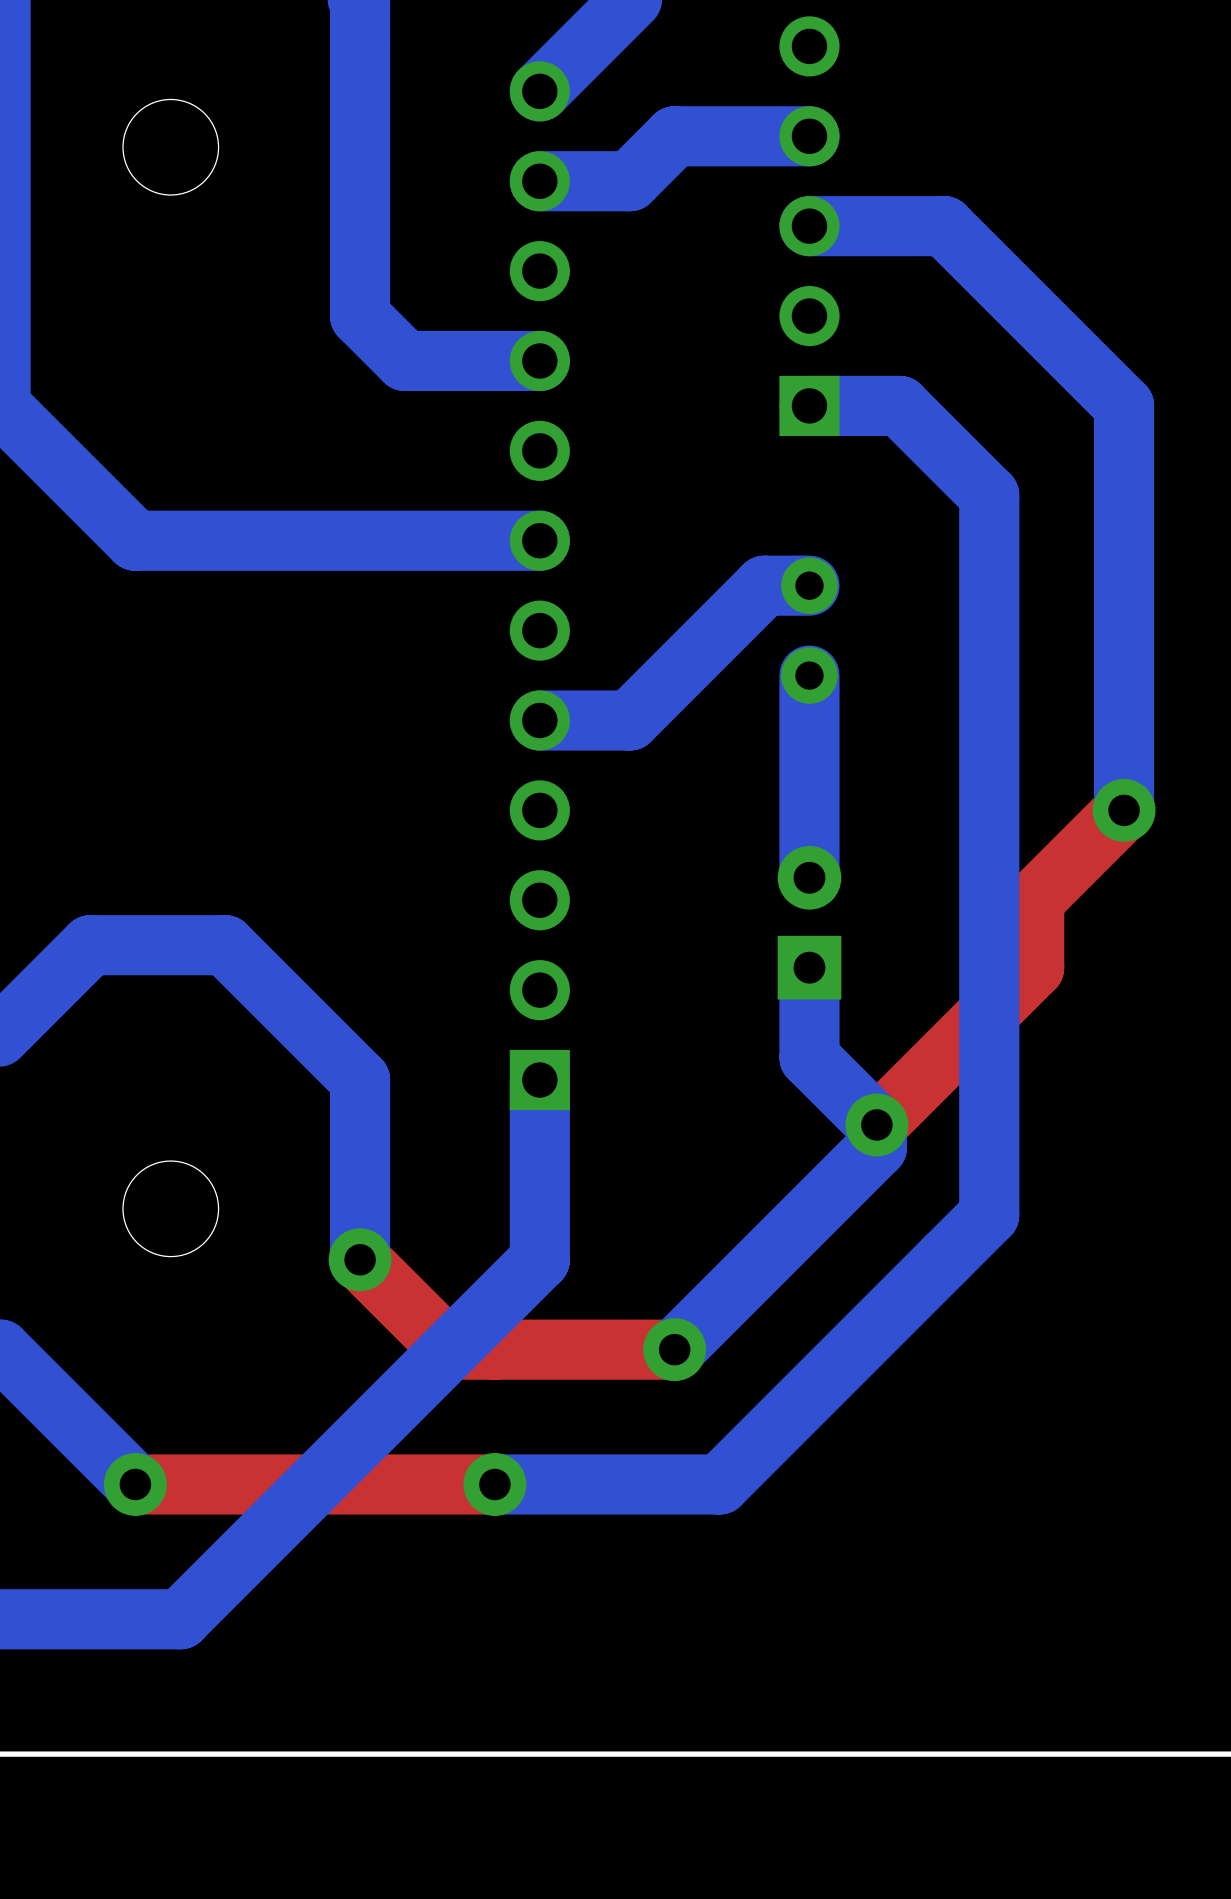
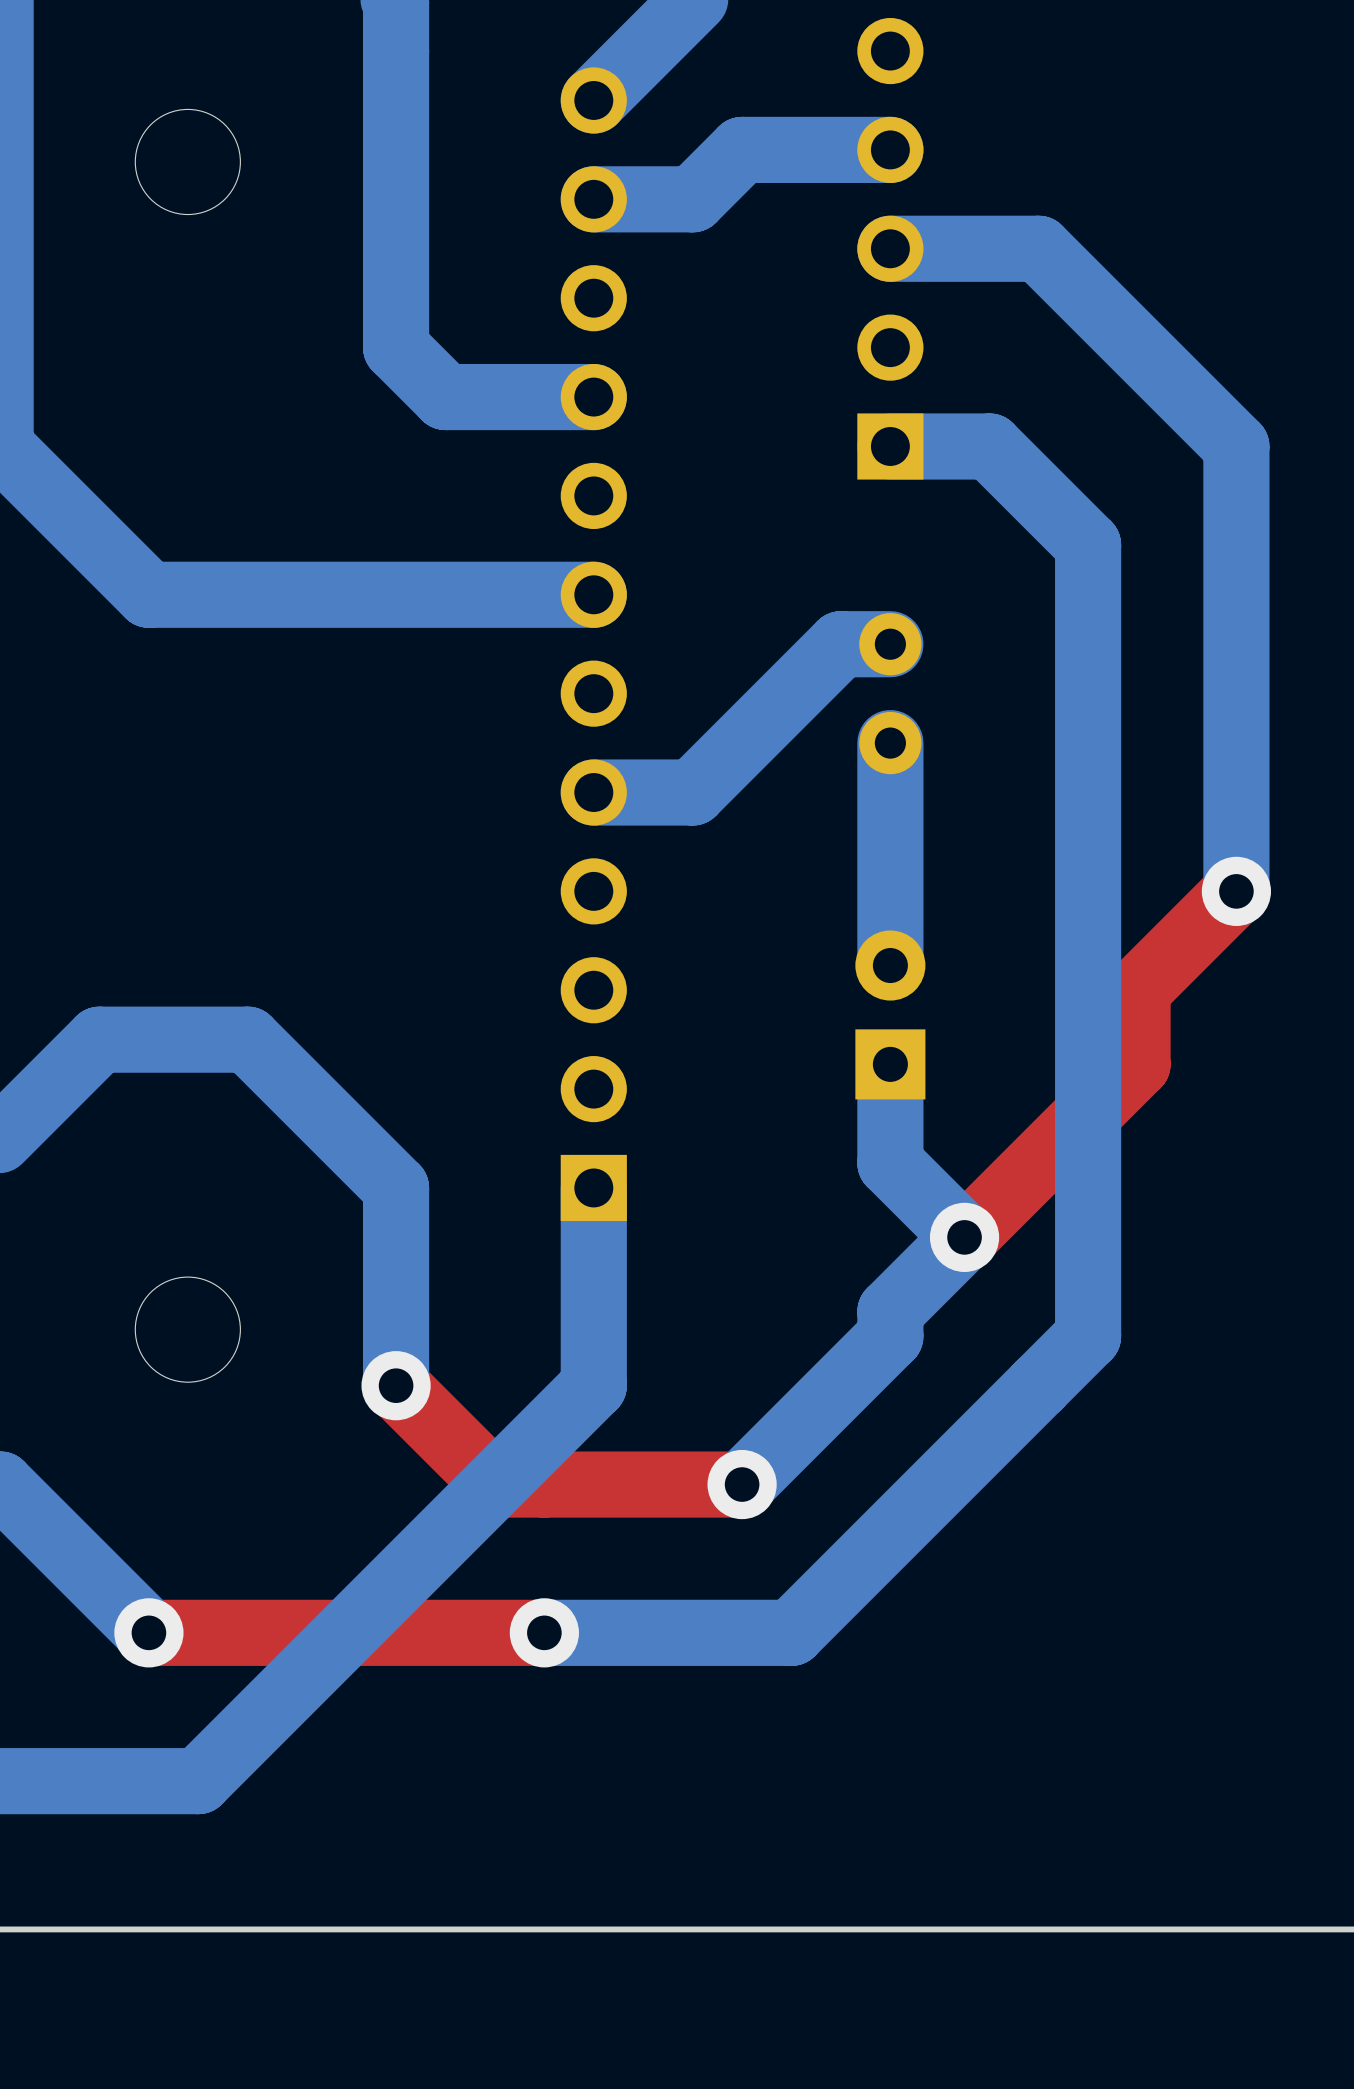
bottom track: (876, 1124) (876, 1147) (809, 1214) -> (964, 1237) (890, 1311) (890, 1336)

